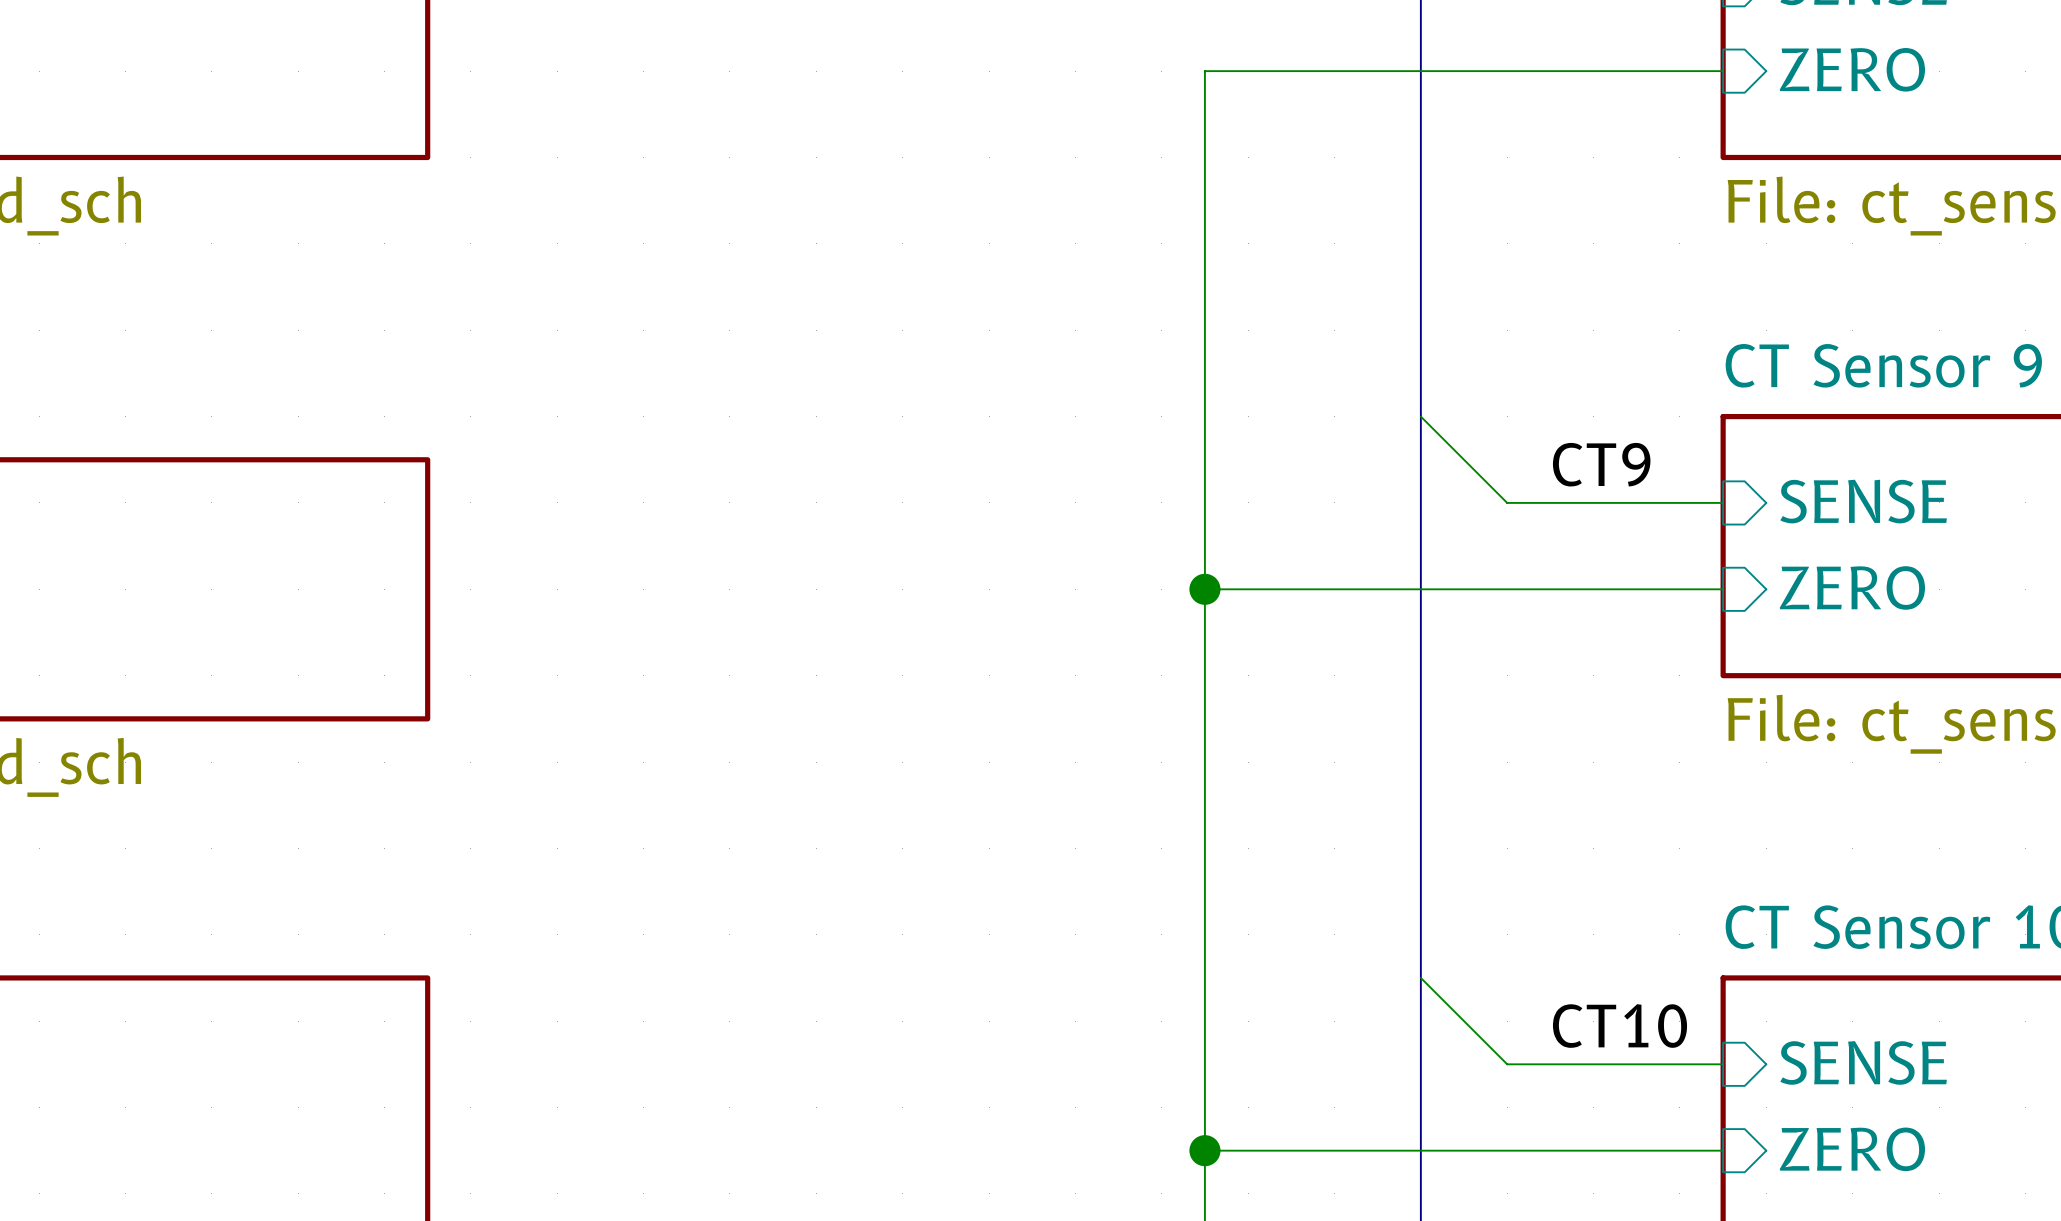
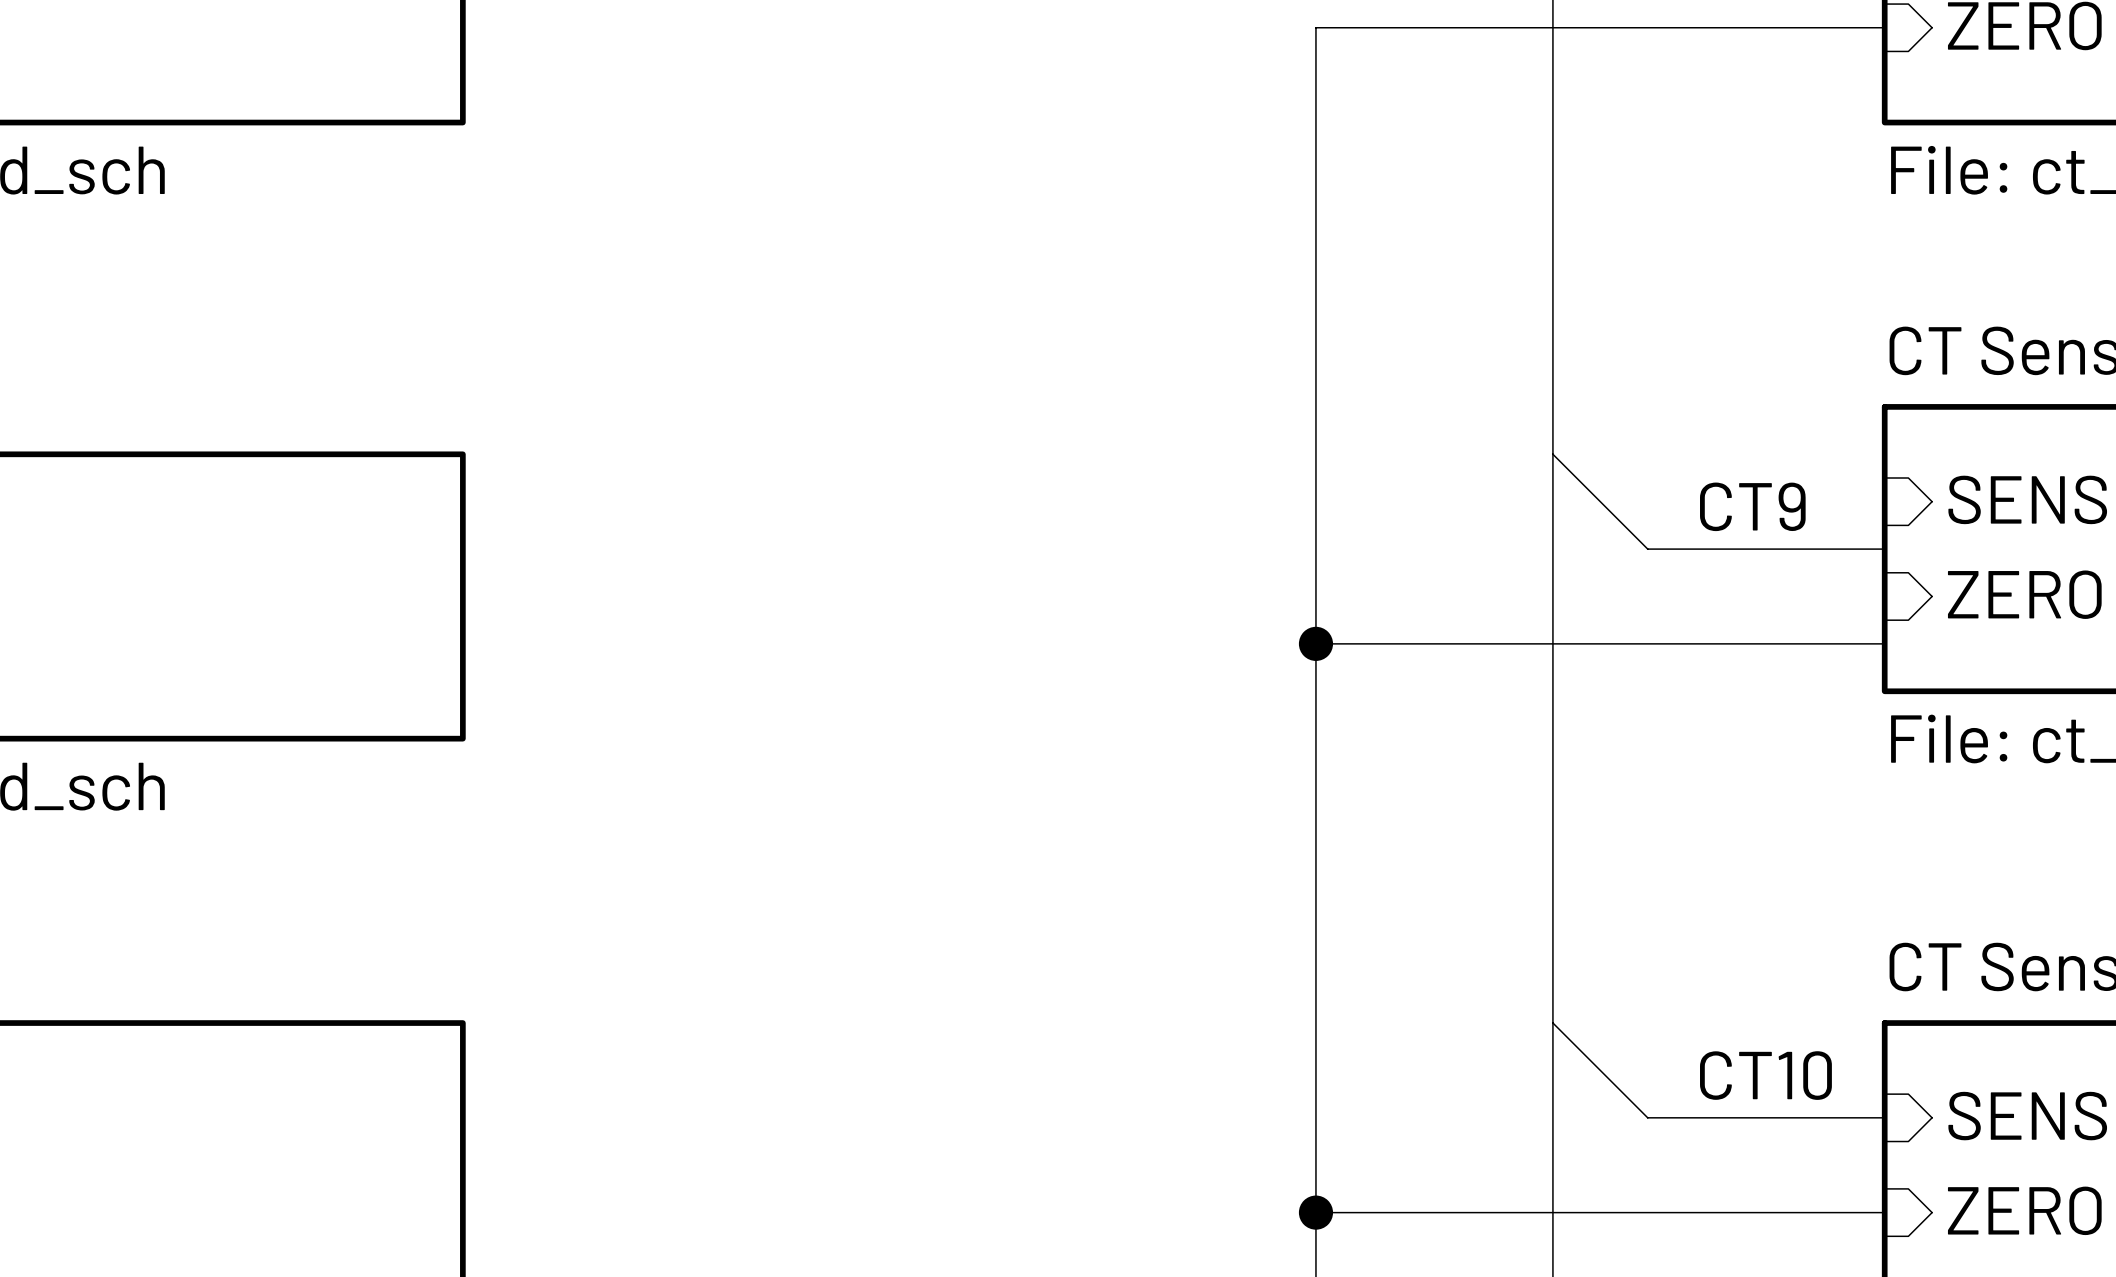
wire: (1420, 416) (1507, 502) (1723, 502) -> (1552, 454) (1647, 549) (1884, 549)
label position: CT9 (1601, 464) -> CT9 (1752, 506)
wire: (1204, 589) (1723, 589) -> (1315, 643) (1884, 643)
junction position: (1204, 589) -> (1315, 643)

